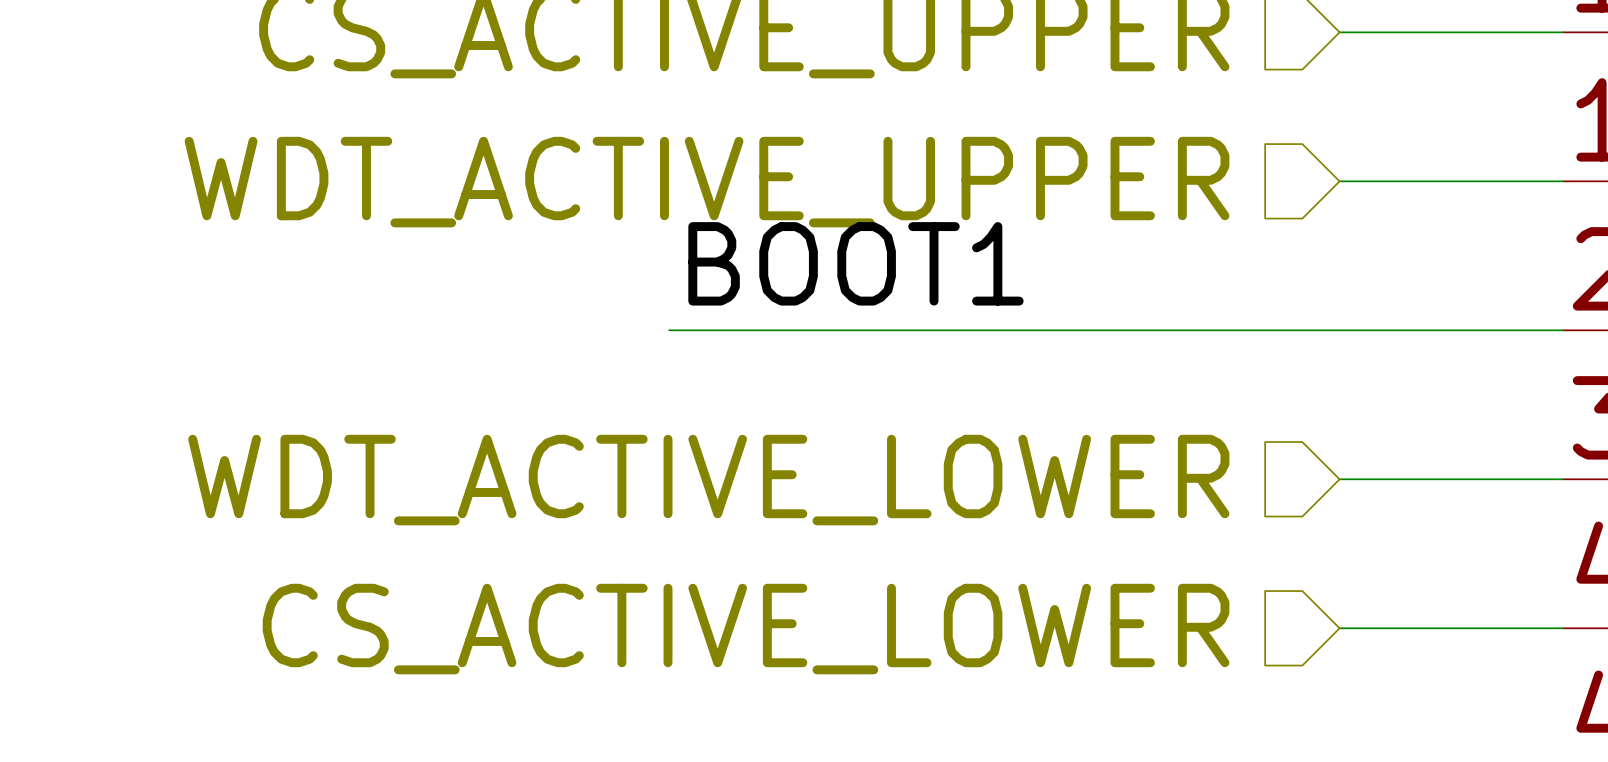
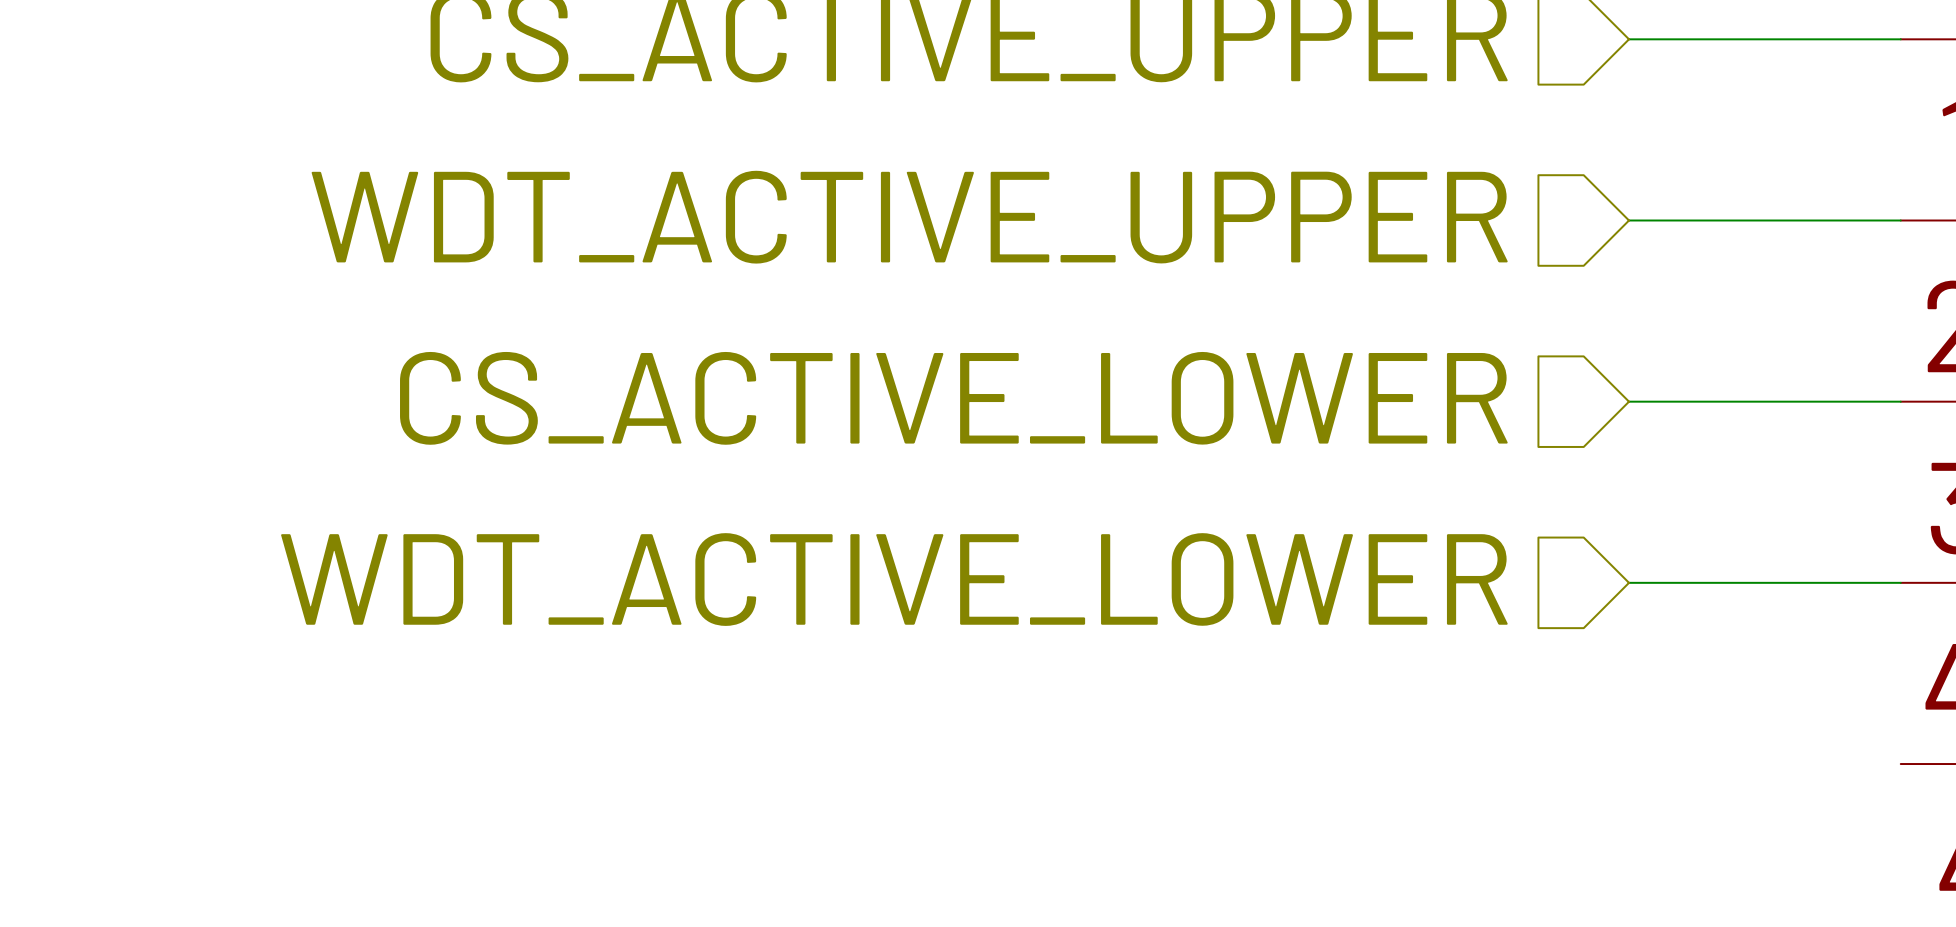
label: BOOT1 (855, 263) -> none
wire: (669, 330) (1339, 330) -> none
wire: (1339, 628) (1563, 628) -> none
hierarchical label position: CS_ACTIVE_LOWER (746, 629) -> CS_ACTIVE_LOWER (953, 398)

